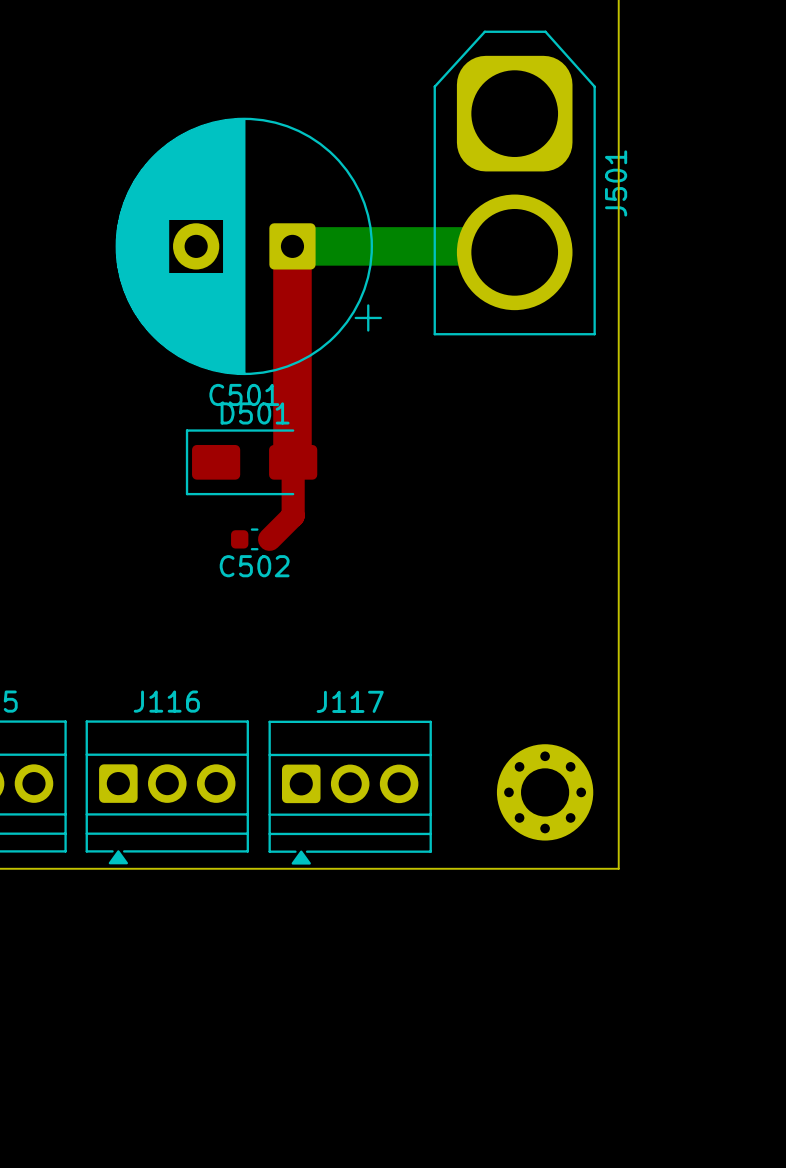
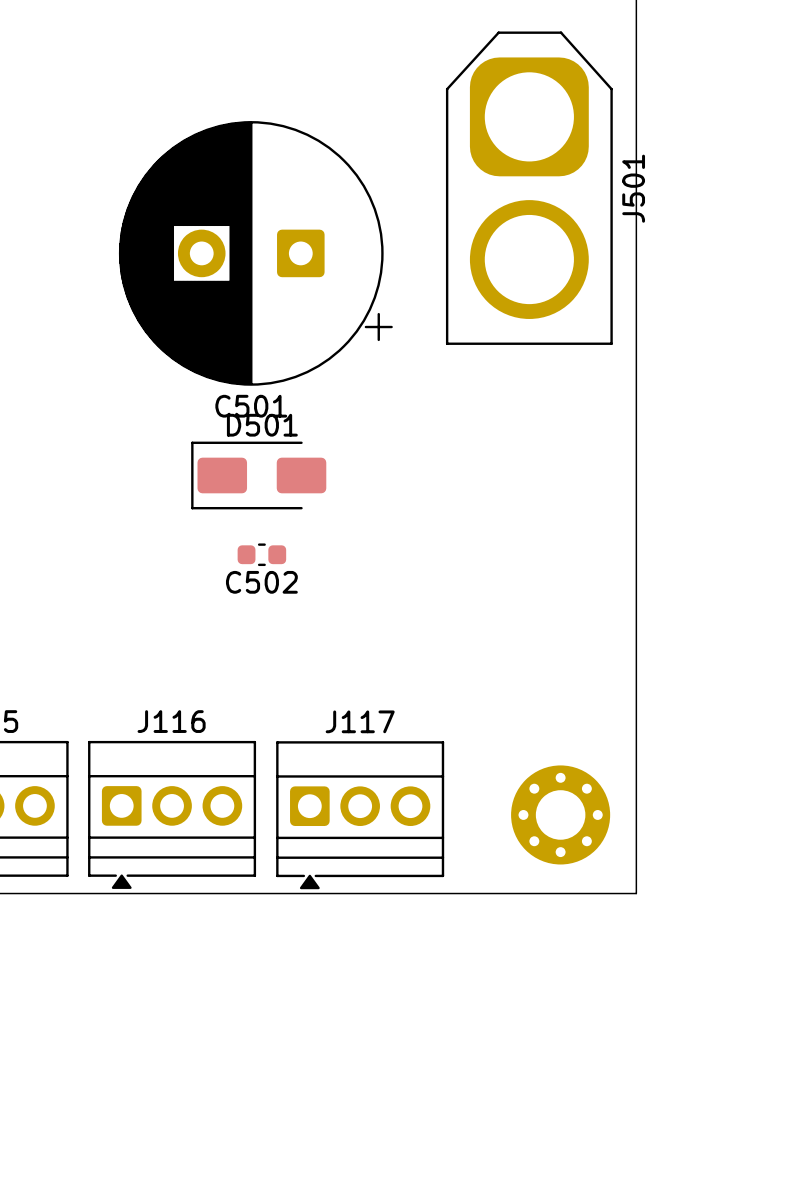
top track: (292, 246) (293, 515) (269, 539) -> none
bottom track: (292, 246) (508, 246) (514, 252) -> none

